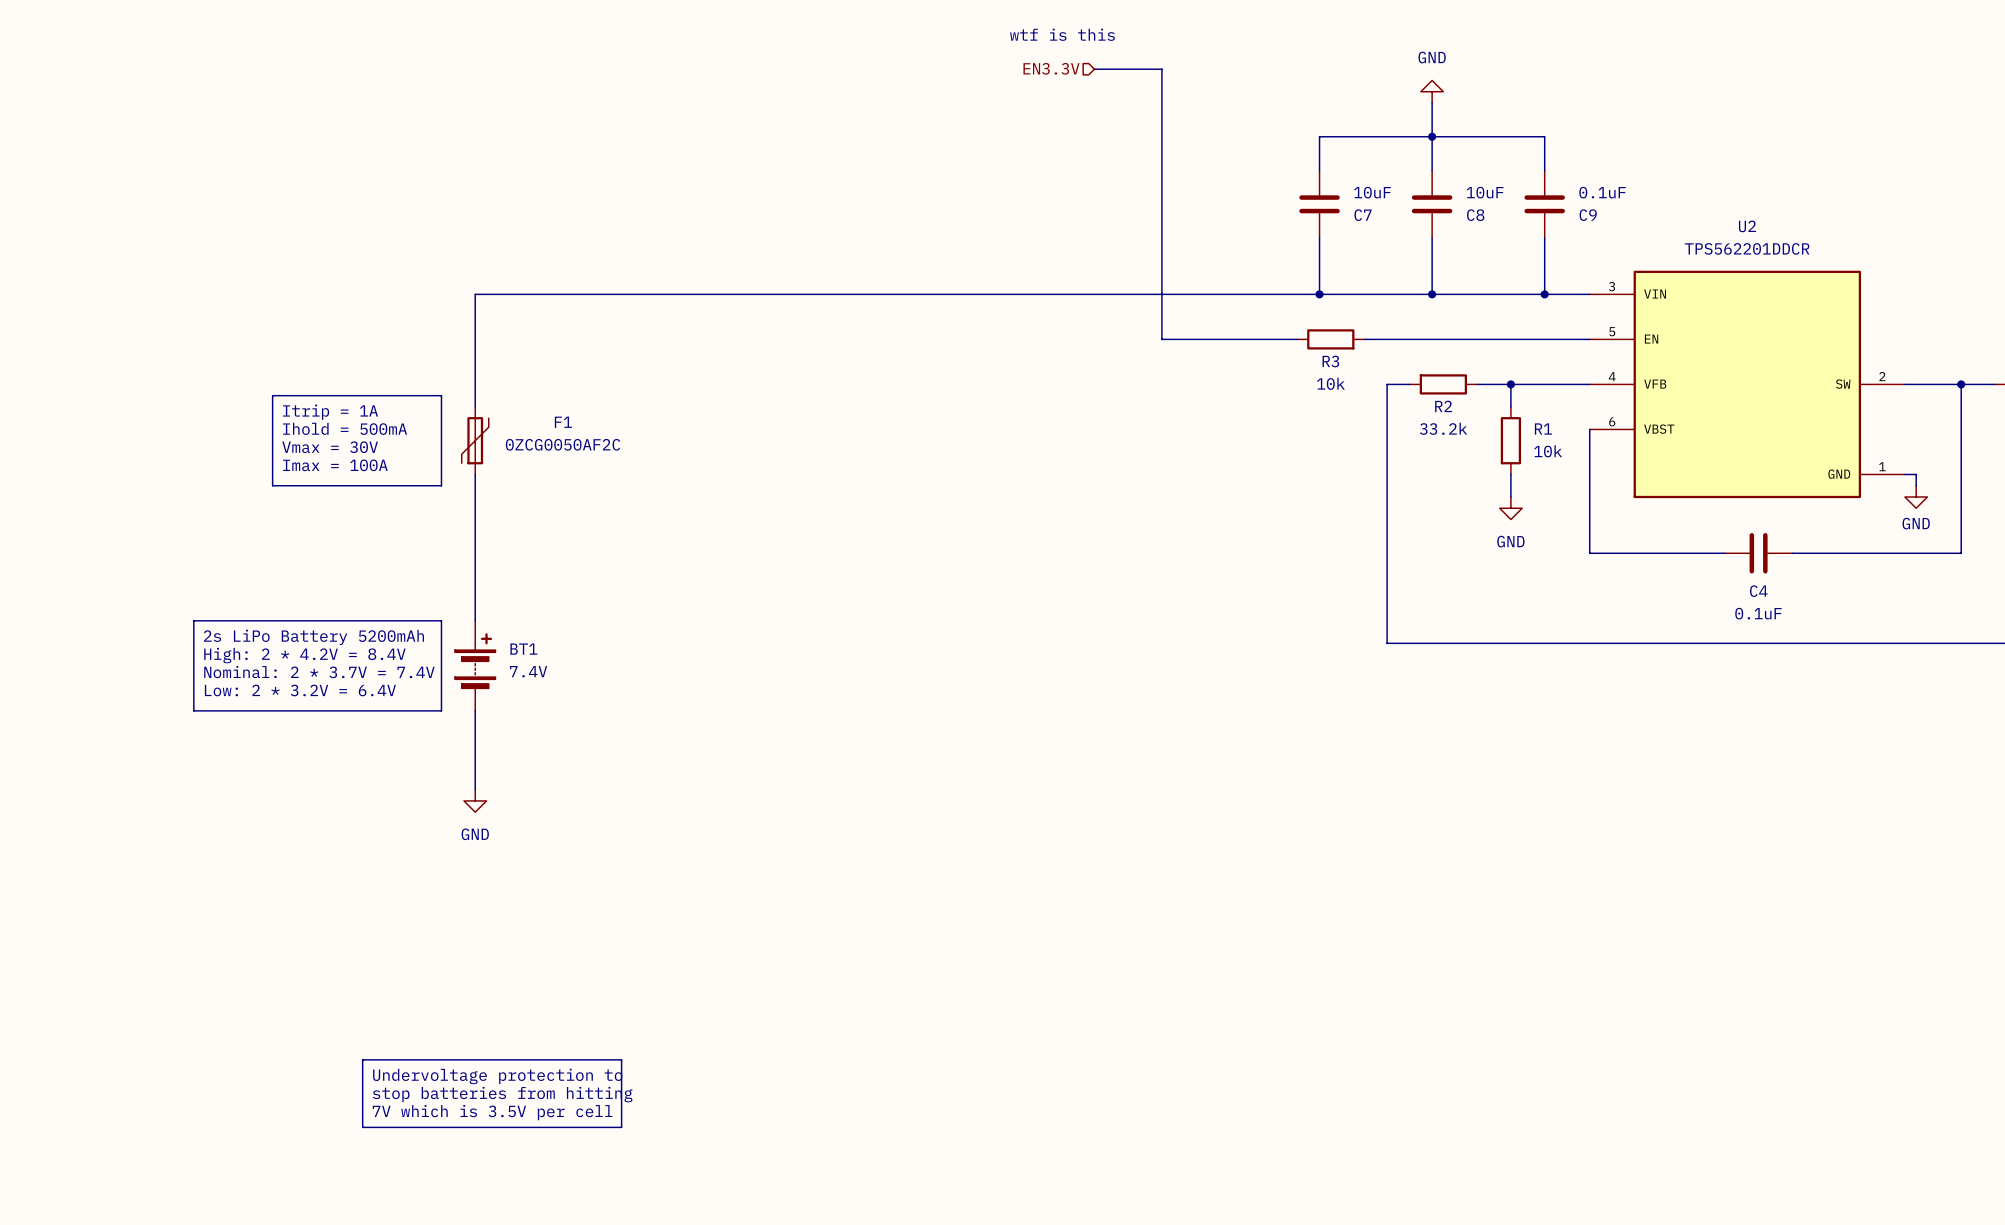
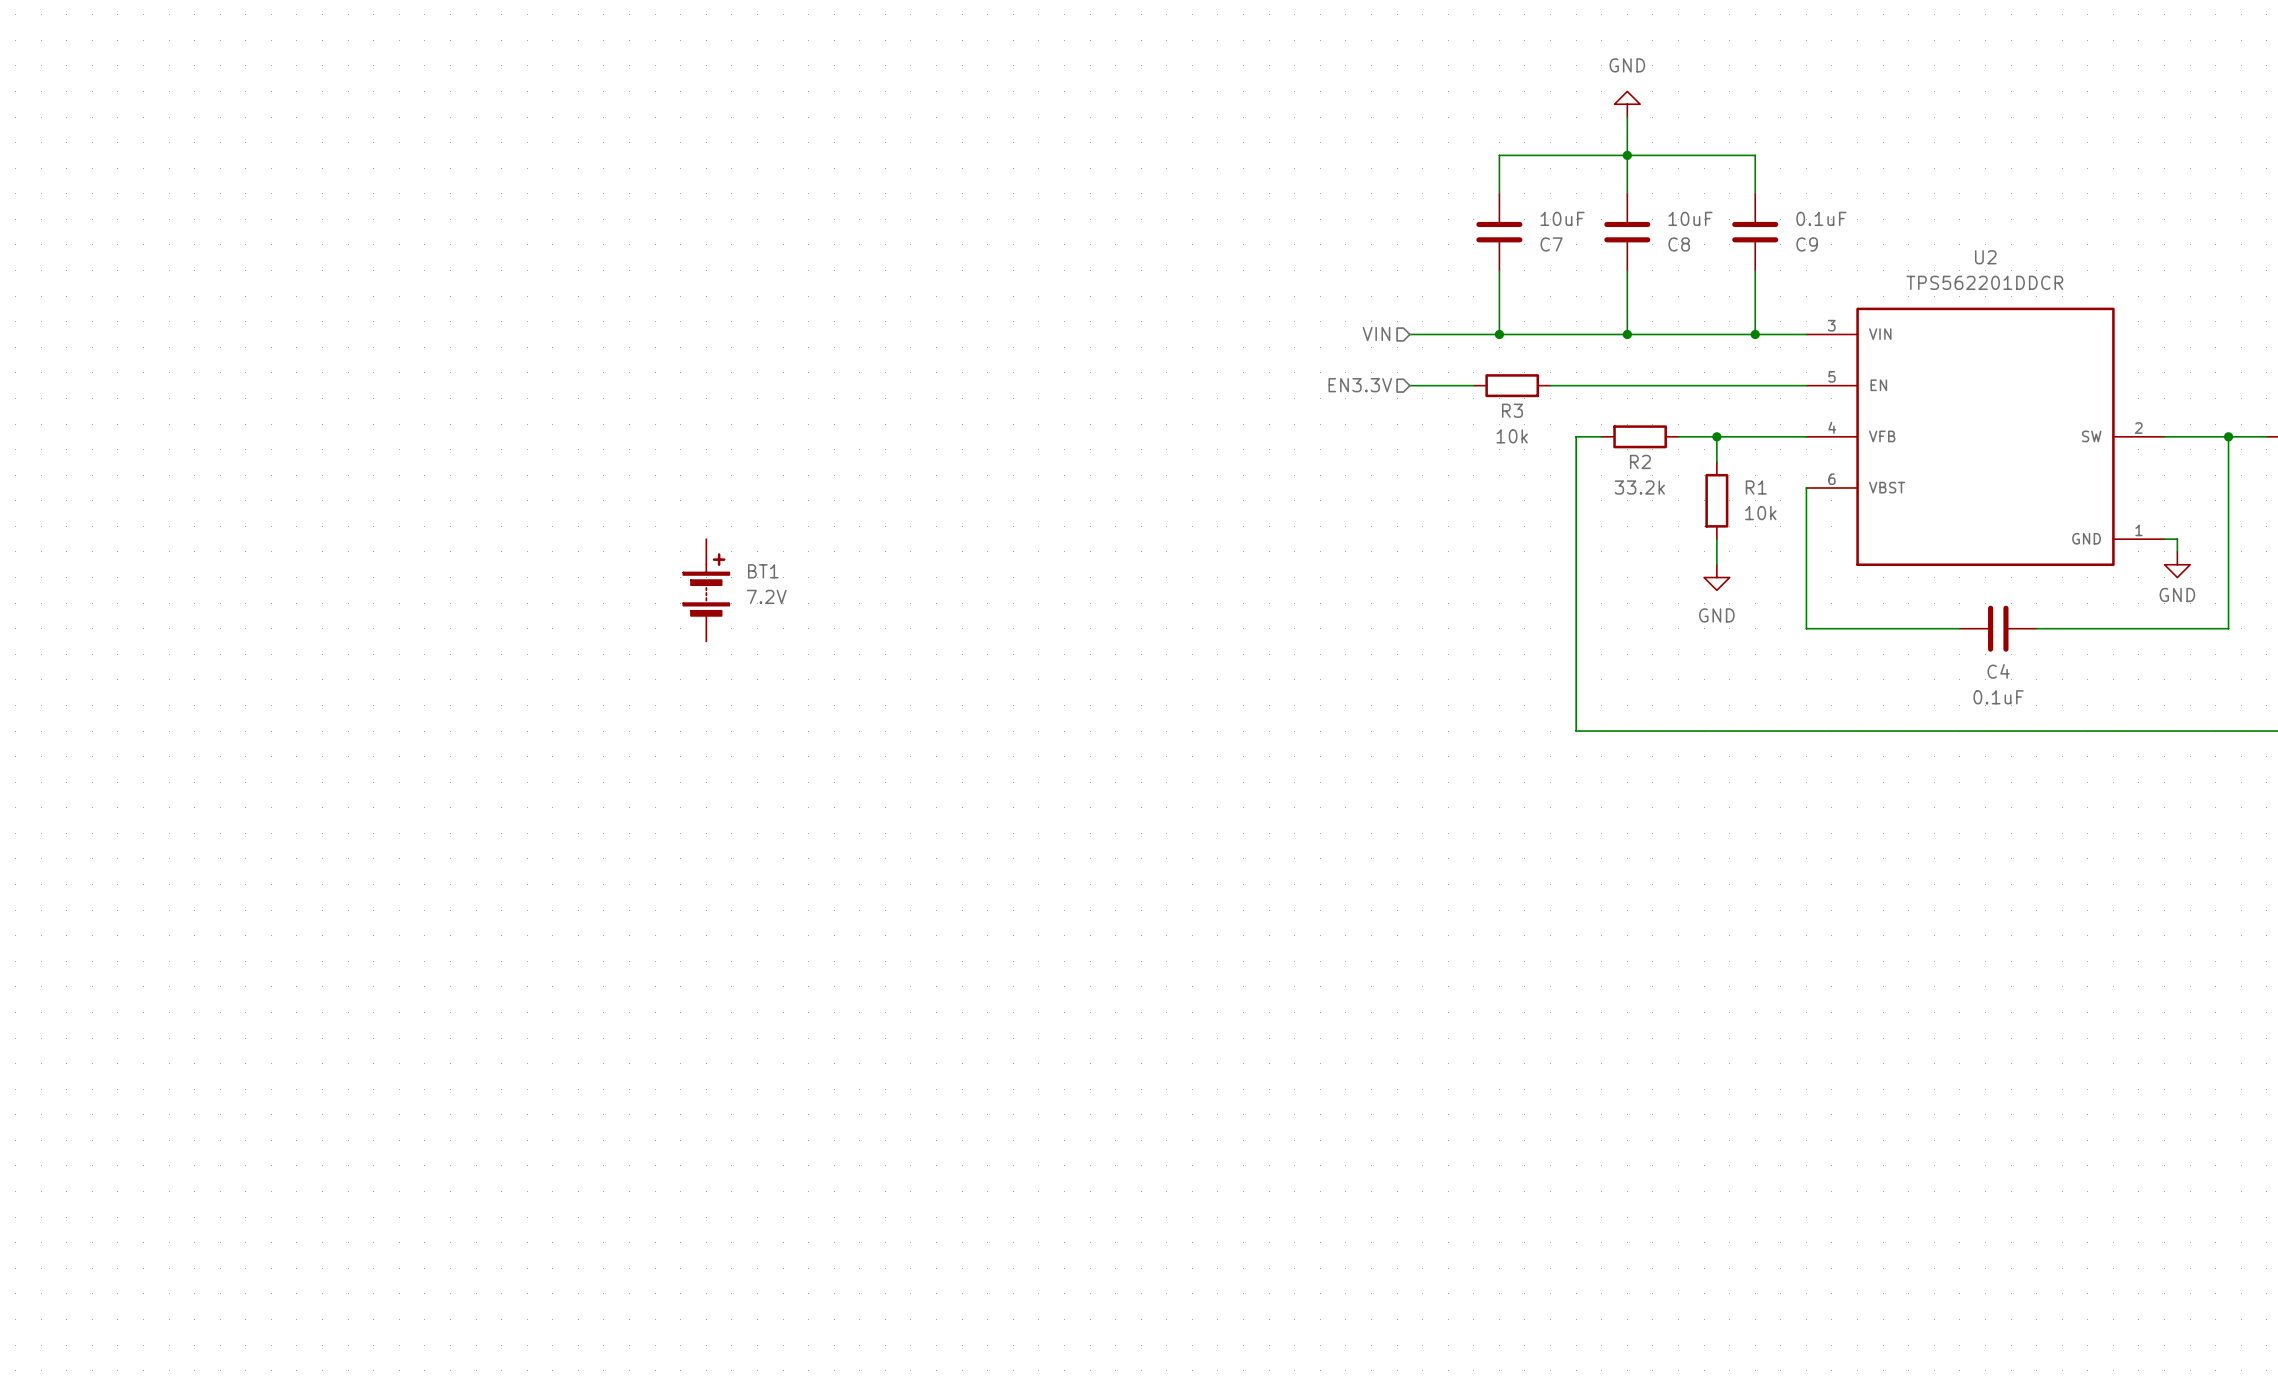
text: wtf is this (1062, 34) -> none
hierarchical label: EN3.3V (1051, 68) -> none
wire: (1094, 69) (1161, 69) (1161, 339) (1240, 339) -> none
hierarchical label: none -> VIN (1376, 334)
wire: (1240, 294) (475, 294) (475, 406) -> none
hierarchical label: none -> EN3.3V (1360, 385)
line: (272, 395) (441, 395) (441, 485) (272, 485) (272, 395) -> none
text: Itrip = 1A (330, 412) -> none
text: Ihold = 500mA (345, 428) -> none
F1: 0ZCG0050AF2C (475, 440) -> none
text: Vmax = 30V (330, 447) -> none
text: Imax = 100A (335, 465) -> none
wire: (475, 474) (475, 620) -> none
line: (193, 620) (441, 620) (441, 710) (193, 710) (193, 620) -> none
text: 2s LiPo Battery 5200mAh (314, 637) -> none
text: High: 2 * 4.2V = 8.4V (304, 655) -> none
BT1 position: (475, 665) -> (706, 590)
BT1 value: 7.4V (528, 671) -> 7.2V (766, 596)
text: Nominal: 2 * 3.7V = 7.4V (319, 672) -> none
text: Low: 2 * 3.2V = 6.4V (300, 690) -> none
wire: (475, 710) (475, 789) -> none
power symbol: GND (475, 800) -> none
line: (362, 1059) (621, 1059) (621, 1127) (362, 1127) (362, 1059) -> none
text: Undervoltage protection to (497, 1076) -> none
text: stop batteries from hitting (502, 1094) -> none
text: 7V which is 3.5V per cell (492, 1112) -> none

